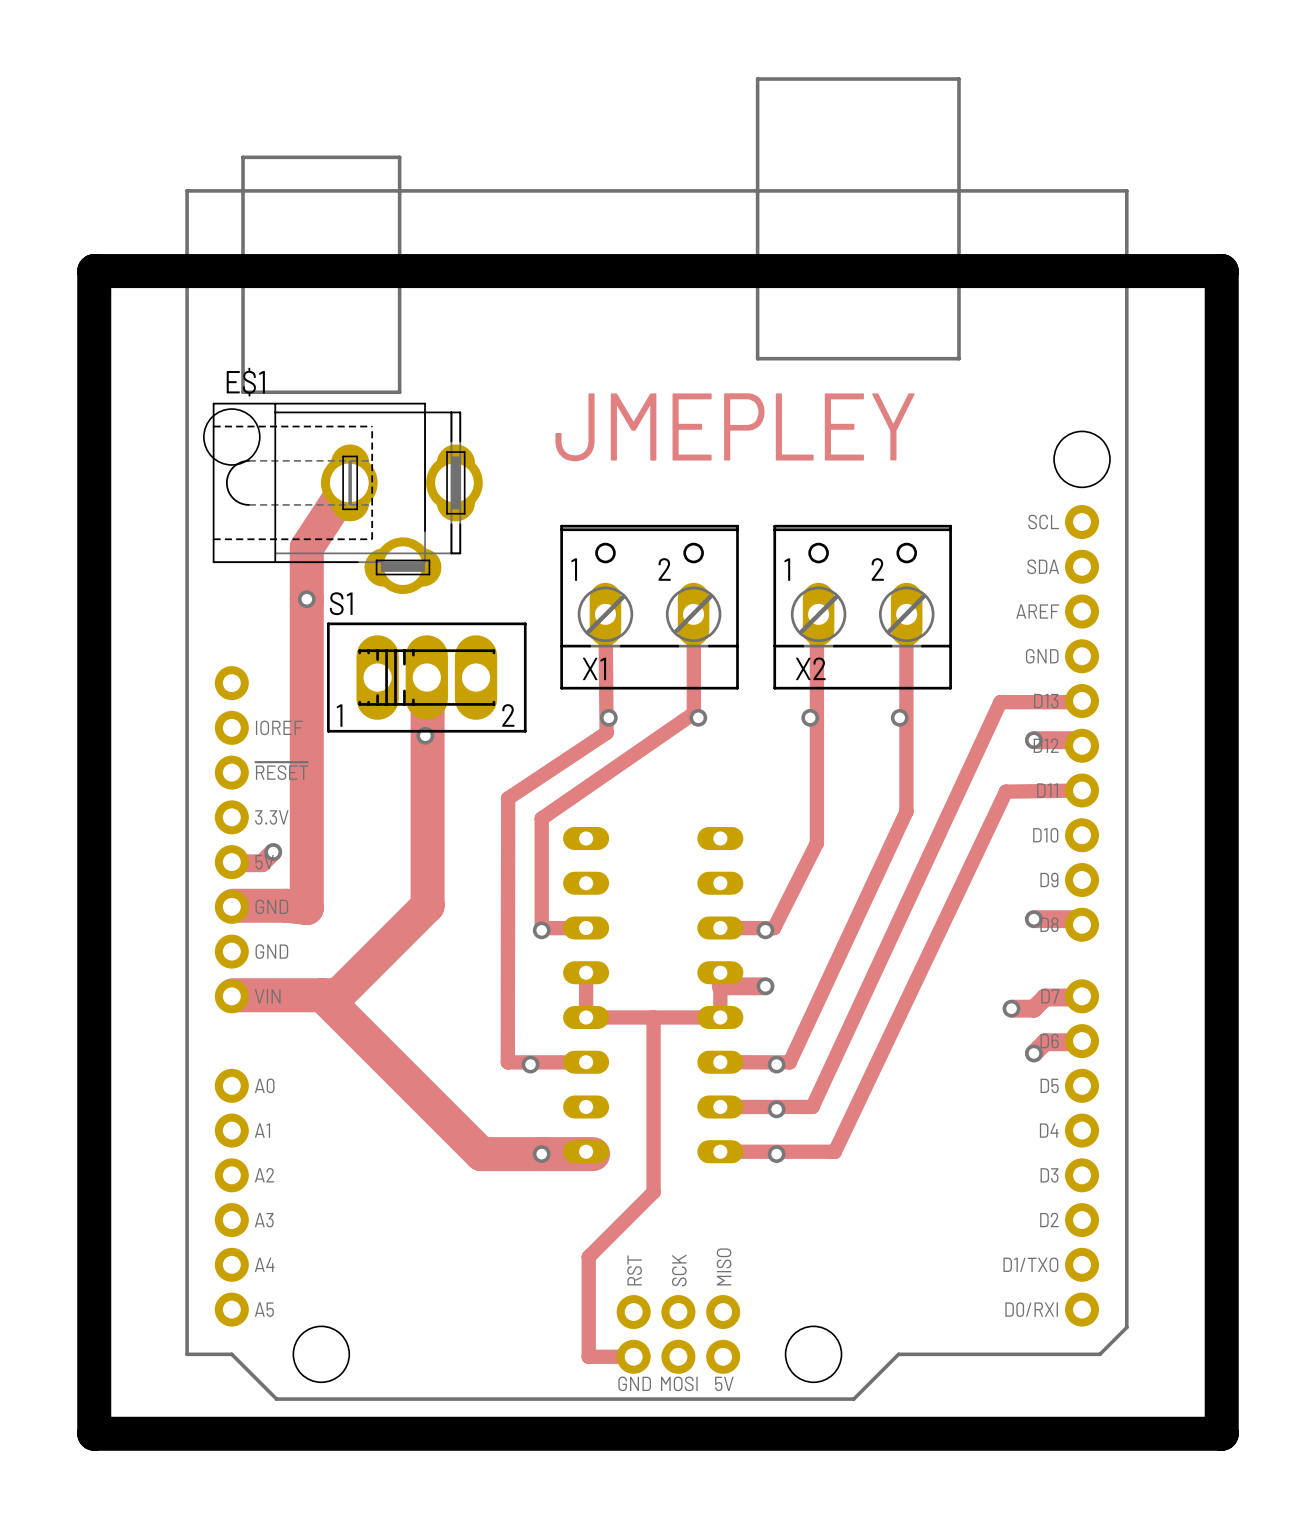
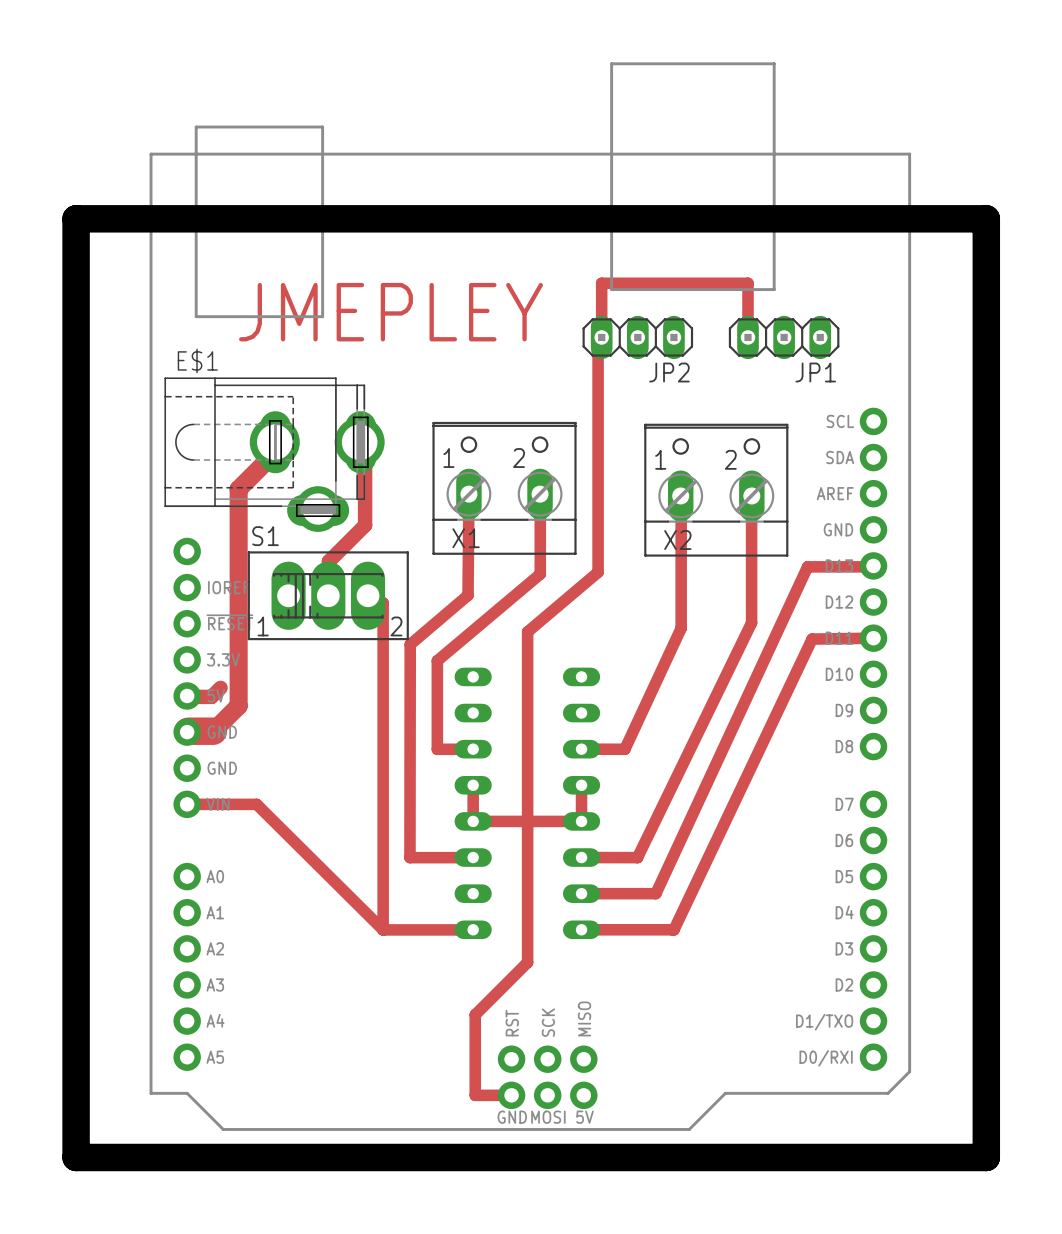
part footprint: [185, 77, 1129, 1401] -> [149, 62, 912, 1131]
E$1 footprint: [212, 402, 483, 595] -> [164, 377, 385, 532]
JP2: none -> (637, 337)
track: none -> (748, 337) (748, 283) (601, 283) (601, 337) (598, 341) (598, 572) (527, 631) (527, 821)
JP1: none -> (784, 337)
text position: JMEPLEY (735, 427) -> JMEPLEY (391, 312)
track: (349, 482) (306, 547) (306, 908) (264, 905) -> (274, 453) (238, 489) (238, 705) (213, 731)
track: none -> (365, 453) (365, 525) (328, 561) (328, 579)
via: (306, 599) -> none
X1 position: (649, 607) -> (504, 488)
X2 position: (862, 607) -> (716, 490)
track: (605, 614) (606, 732) (508, 798) -> (468, 494) (468, 595) (410, 644)
track: (693, 614) (693, 713) (541, 818) -> (540, 494) (540, 574) (437, 660)
track: (818, 614) (816, 843) (774, 928) -> (680, 495) (681, 628) (624, 749)
track: (906, 614) (906, 811) (789, 1062) -> (751, 495) (751, 622) (637, 857)
S1 position: (426, 677) -> (328, 595)
track: (427, 677) (427, 905) (338, 995) (232, 995) -> none
via: (608, 717) -> none
via: (698, 717) -> none
via: (810, 717) -> none
via: (899, 717) -> none
via: (425, 735) -> none
track: none -> (368, 595) (383, 602) (383, 929)
track: (1033, 740) (1078, 740) -> none
via: (1033, 740) -> none
via: (273, 852) -> none
track: (1033, 919) (1078, 919) -> none
via: (1033, 919) -> none
via: (541, 930) -> none
via: (765, 930) -> none
track: (720, 986) (765, 986) -> none
via: (765, 986) -> none
track: (322, 995) (481, 1154) (593, 1154) -> none
track: (1078, 997) (1045, 997) (1033, 1008) (1011, 1008) -> none
via: (1011, 1008) -> none
track: (1078, 1042) (1045, 1042) (1033, 1053) -> none
via: (1033, 1053) -> none
via: (530, 1064) -> none
via: (776, 1064) -> none
via: (776, 1109) -> none
via: (541, 1154) -> none
via: (776, 1154) -> none

